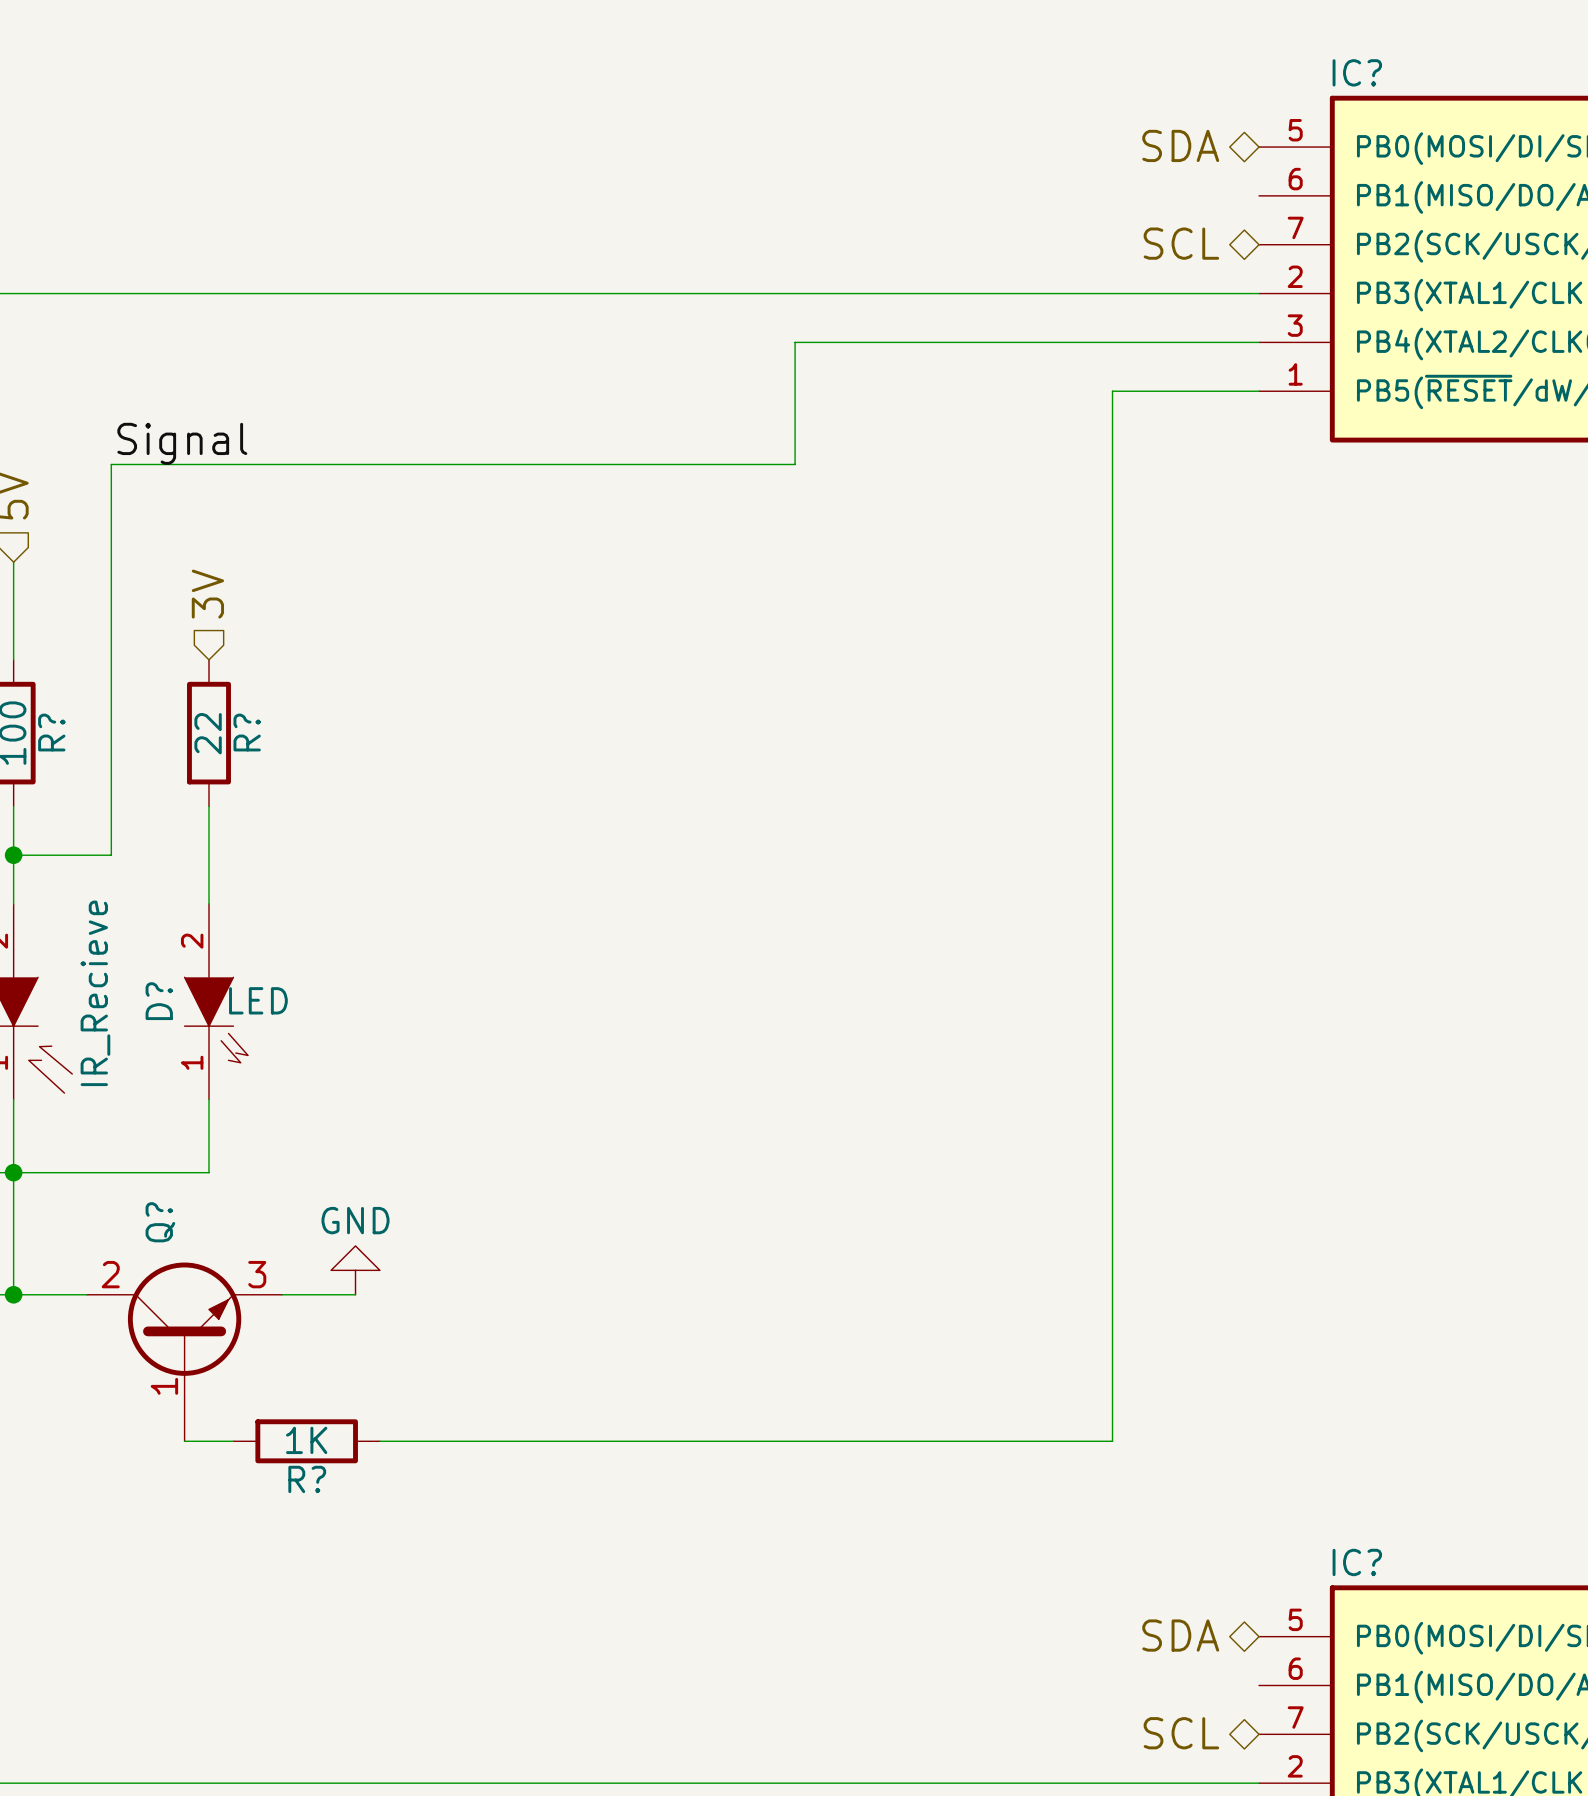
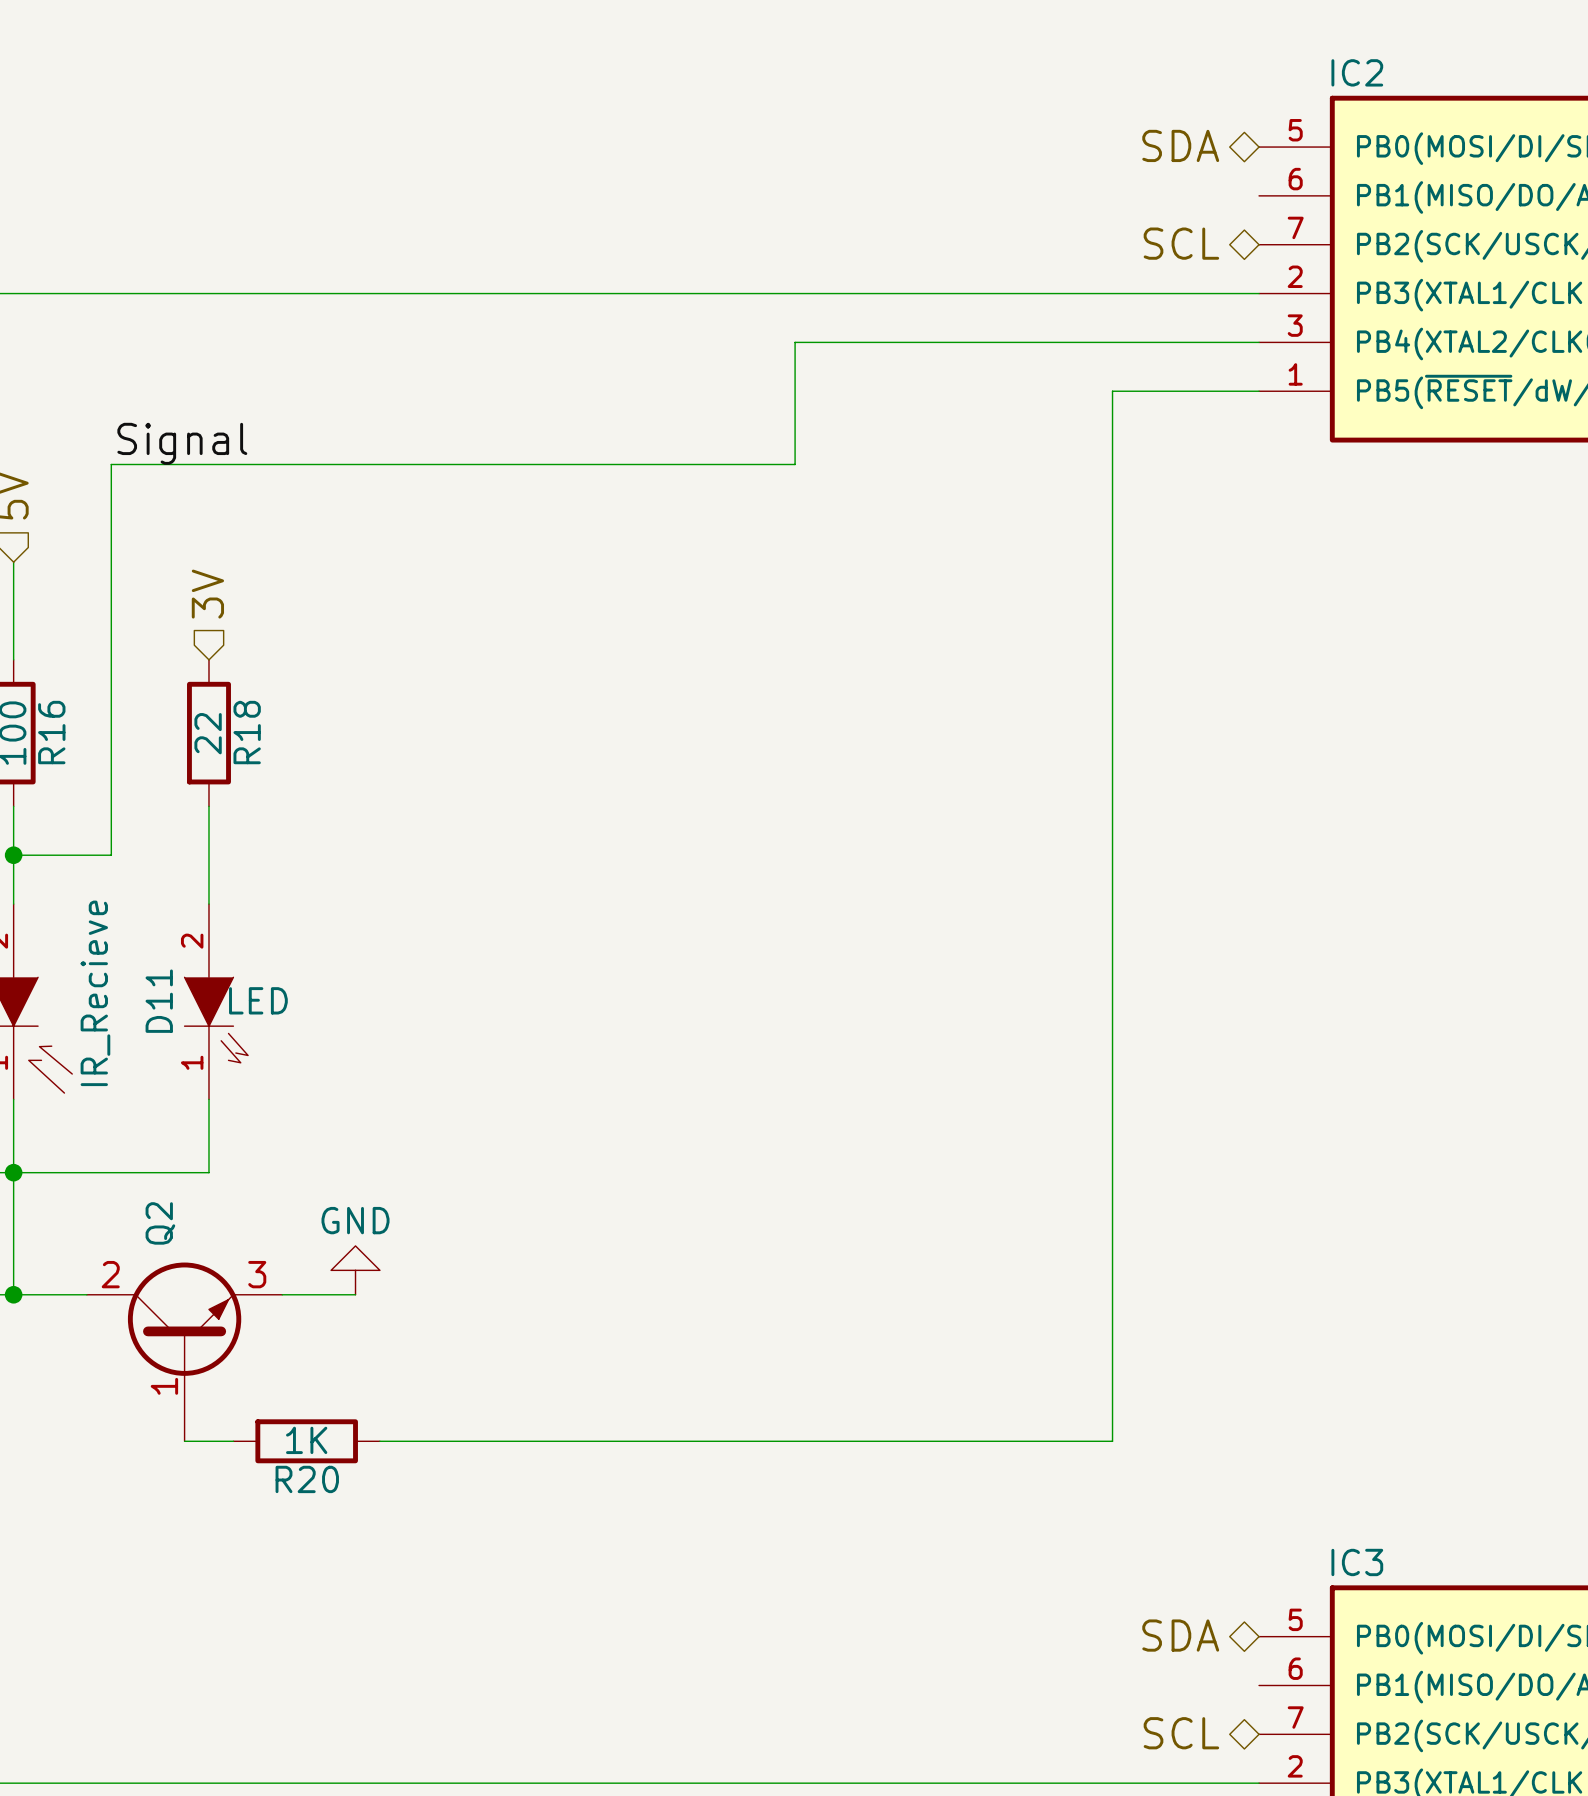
IC? name: IC? (1357, 72) -> IC2 (1357, 72)
R? name: R? (51, 732) -> R16 (51, 732)
R? name: R? (247, 732) -> R18 (247, 732)
D? name: D? (159, 1001) -> D11 (159, 1001)
Q? name: Q? (160, 1222) -> Q2 (160, 1223)
R? name: R? (307, 1479) -> R20 (307, 1479)
IC? name: IC? (1357, 1562) -> IC3 (1357, 1562)

